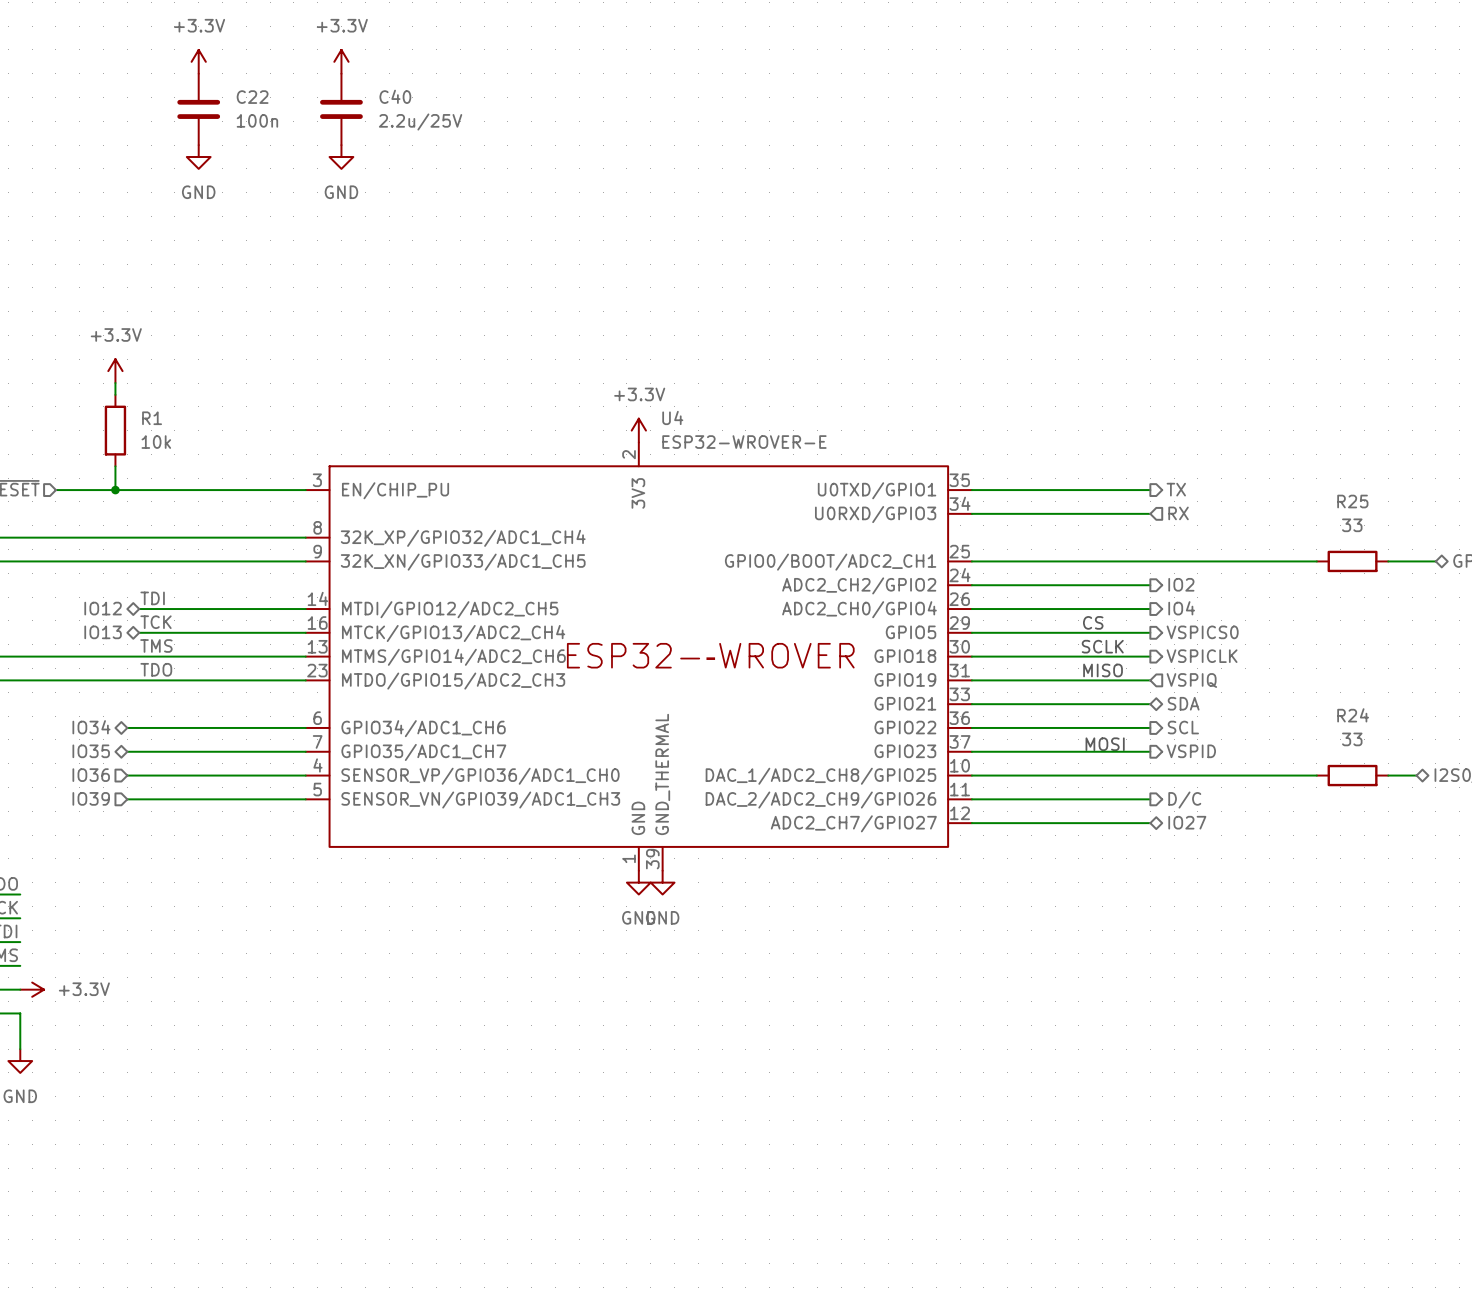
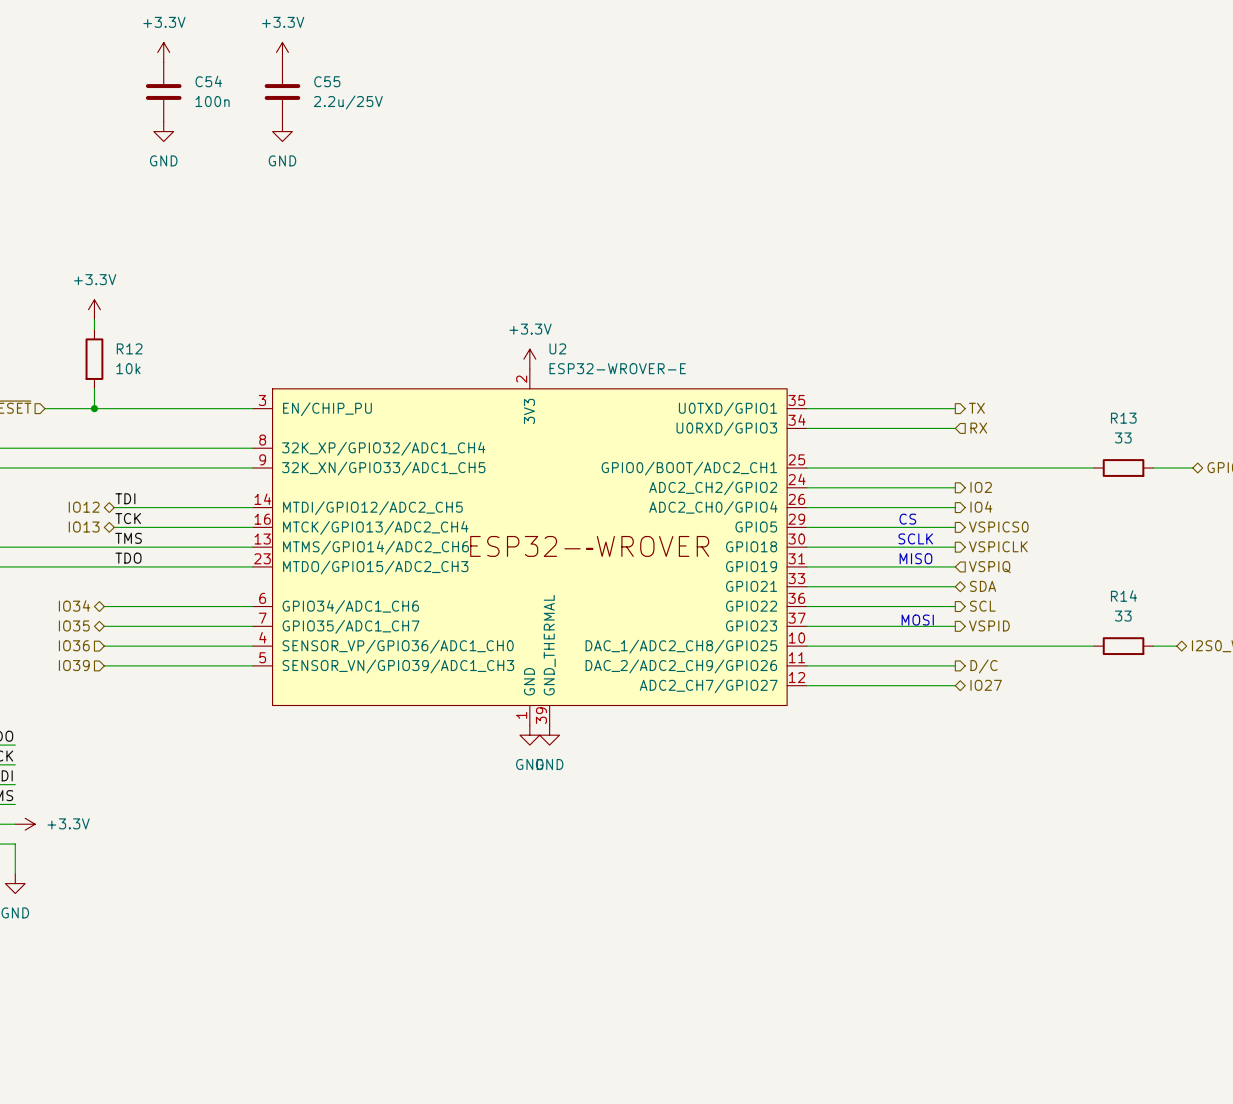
C40 name: C40 (395, 96) -> C55 (327, 81)
C22 name: C22 (252, 97) -> C54 (208, 81)
U4 name: U4 (672, 417) -> U2 (557, 348)
R1 name: R1 (152, 418) -> R12 (129, 348)
R25 name: R25 (1352, 501) -> R13 (1123, 418)
R24 name: R24 (1353, 715) -> R14 (1124, 596)

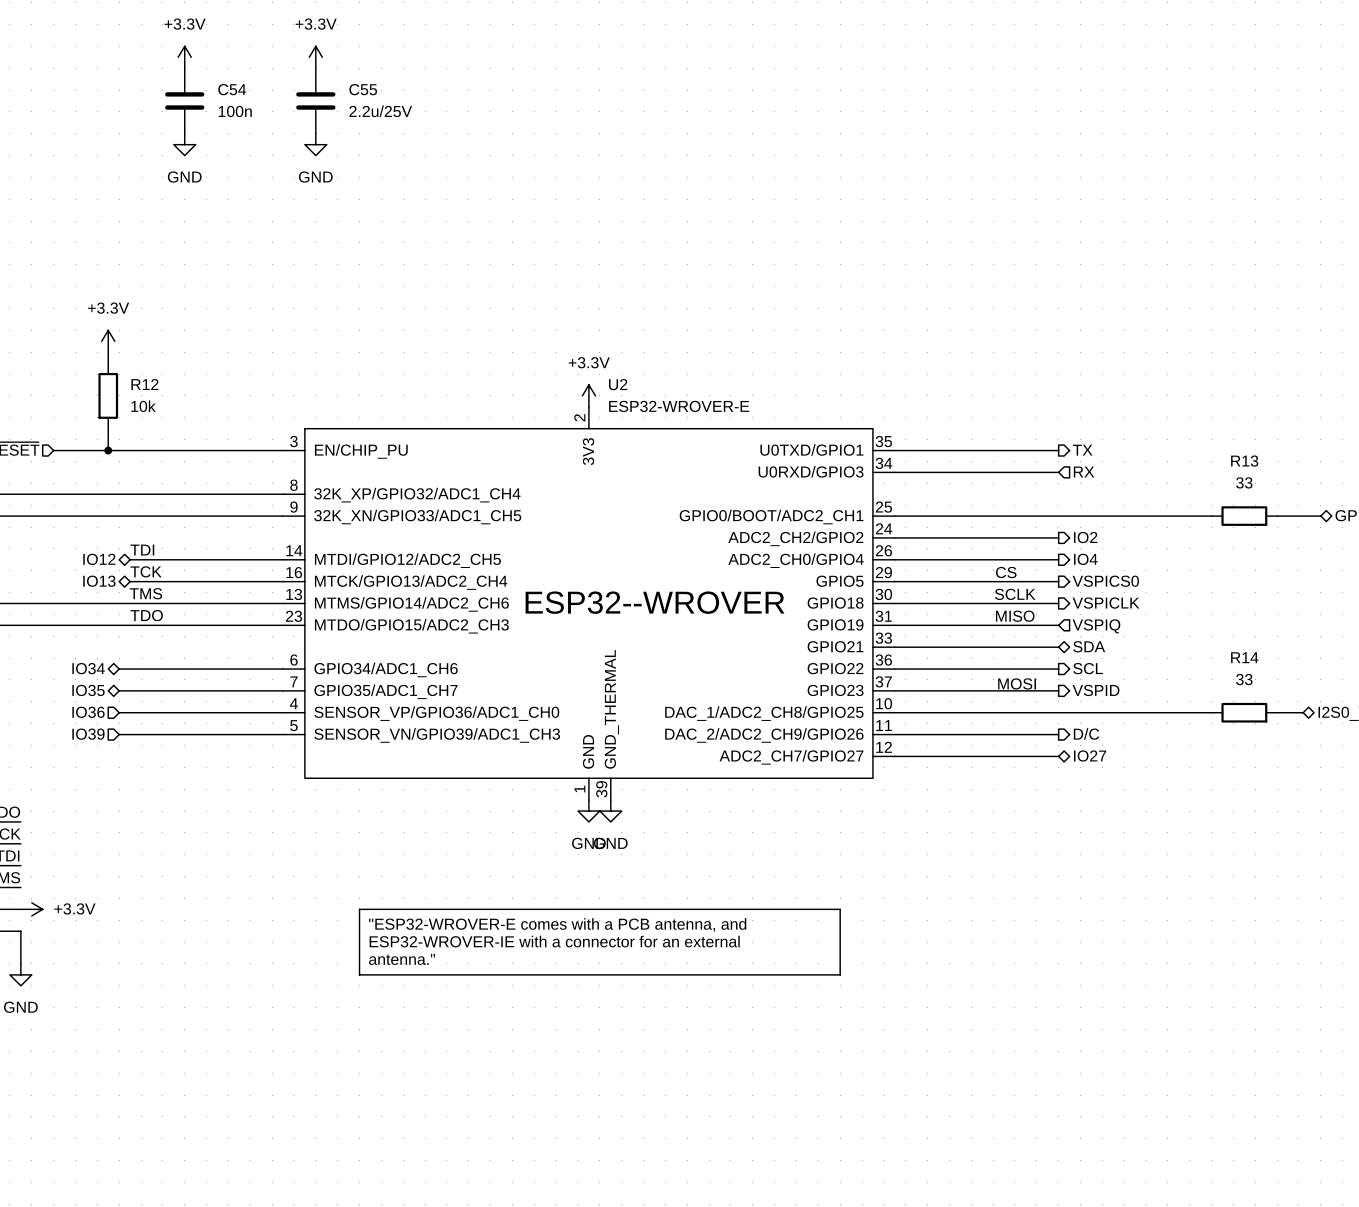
line: none -> (359, 909) (840, 909) (840, 974) (359, 974) (359, 909)
text: none -> "ESP32-WROVER-E comes with a PCB antenna, and (557, 924)
text: none -> ESP32-WROVER-IE with a connector for an external (554, 941)
text: none -> antenna." (402, 959)

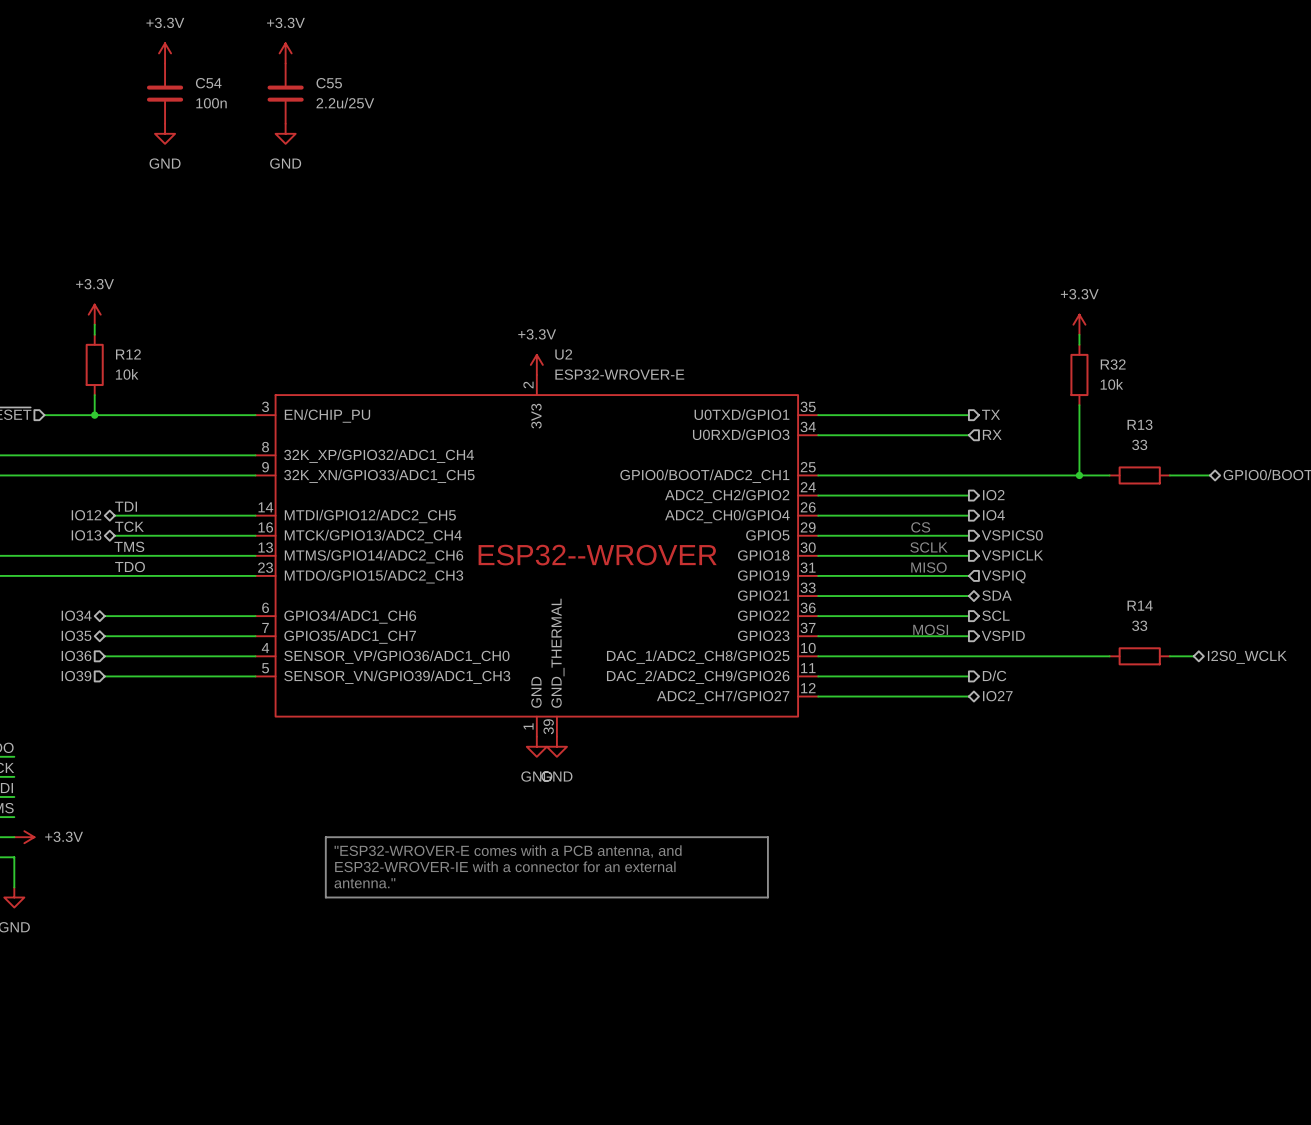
power symbol: none -> +3.3V (1079, 324)
wire: none -> (1079, 334) (1079, 344)
R32: none -> 10k (1079, 374)
wire: none -> (1079, 405) (1079, 475)
junction: none -> (1079, 475)

